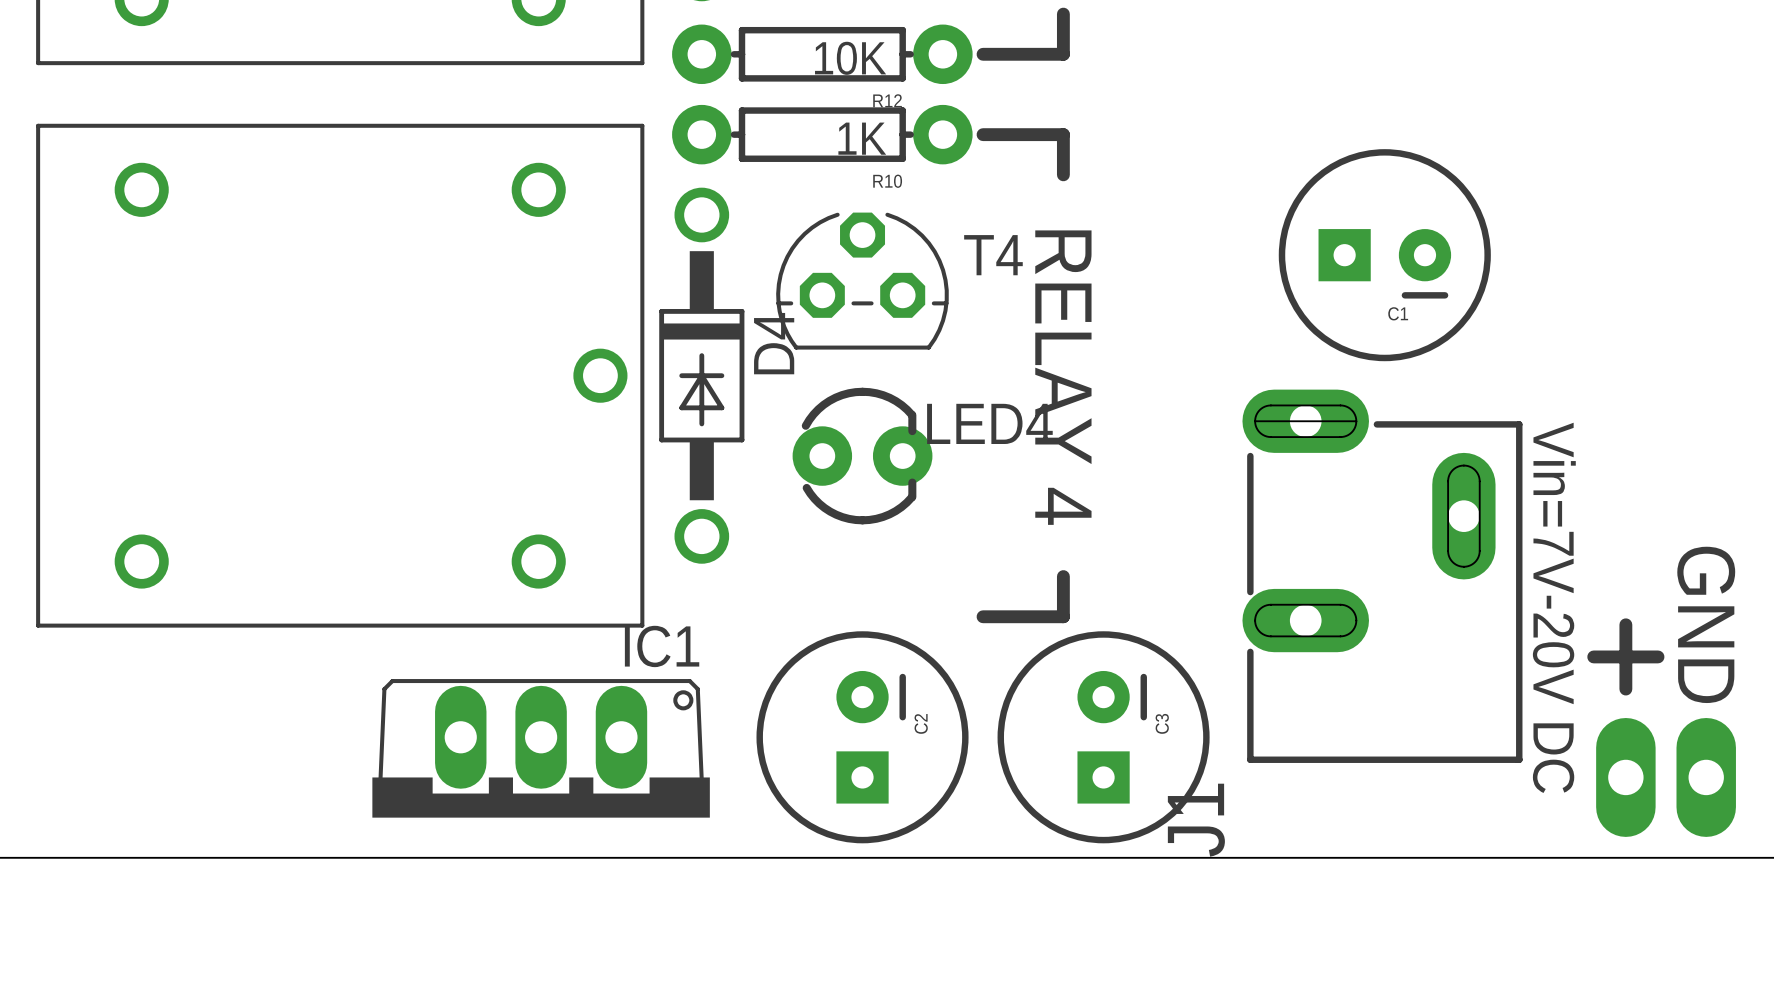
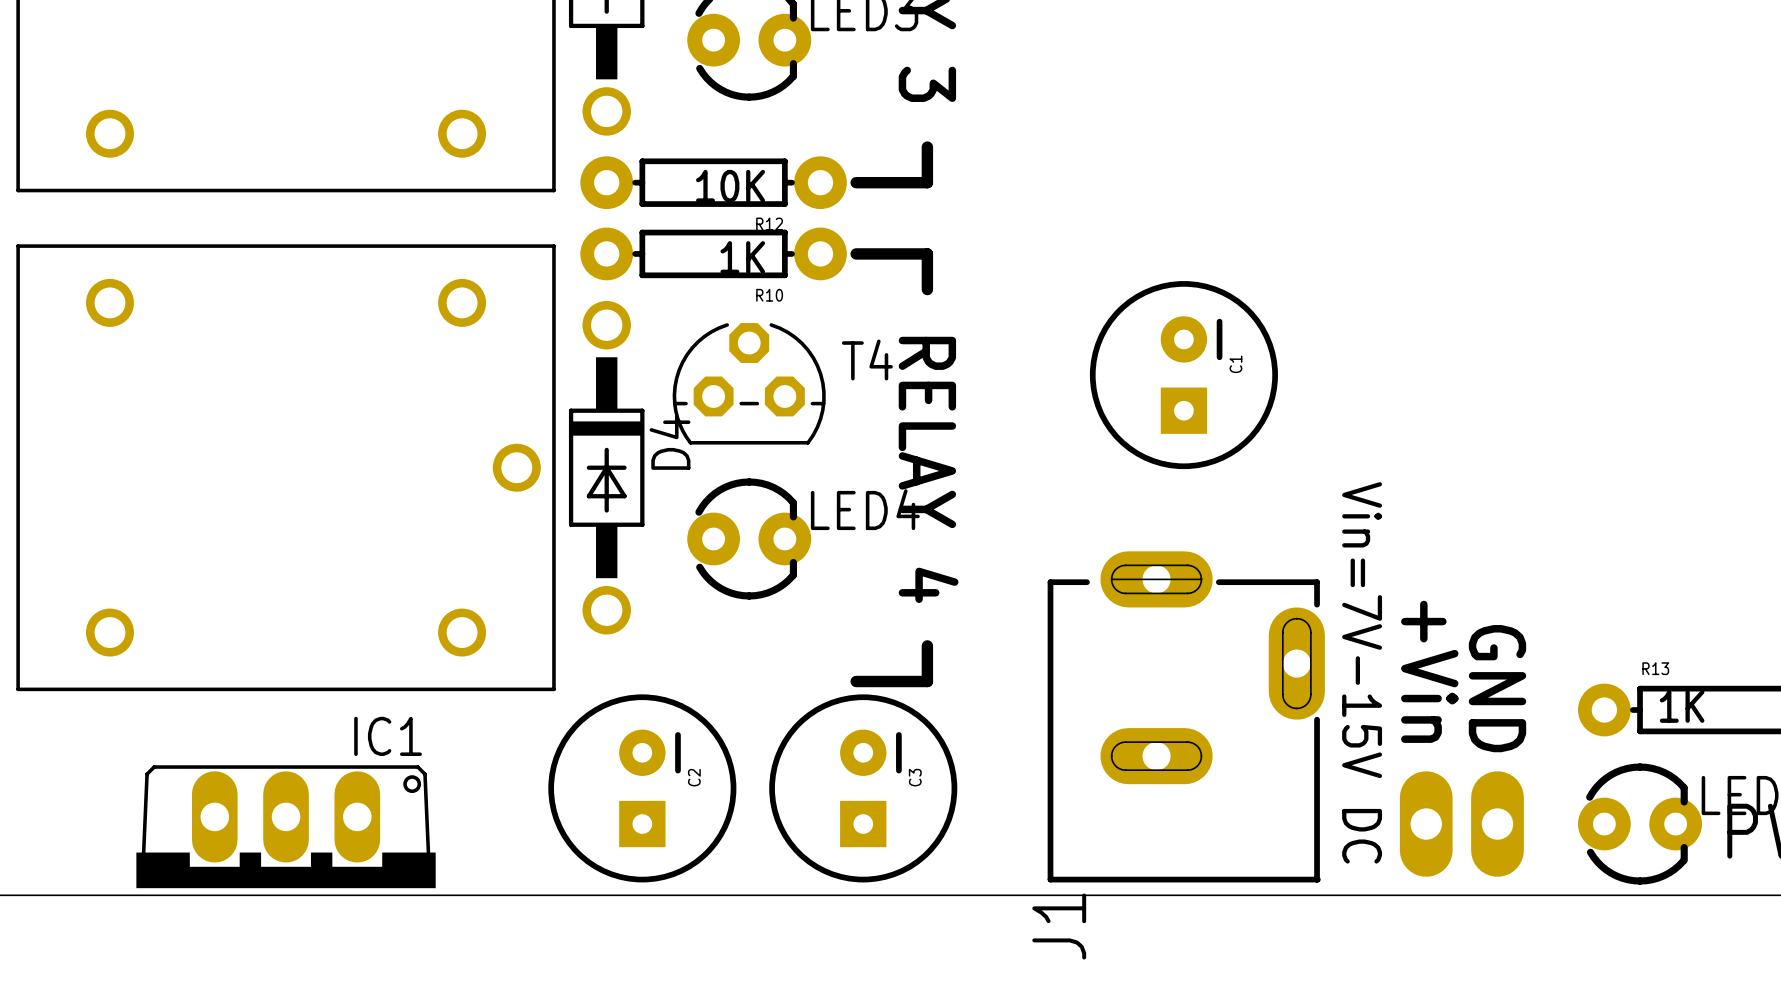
C1 rotation: 0° (1384, 255) -> 90° counterclockwise (1183, 375)
J1 footprint: [1242, 389, 1523, 763] -> [1047, 551, 1325, 883]
text: none -> +Vin (1429, 671)
text: Vin=7V-20V DC (1554, 607) -> Vin=7V-15V DC (1362, 672)
line: (1625, 624) (1625, 689) -> none
line: (1593, 656) (1658, 656) -> none
C2 position: (862, 737) -> (642, 788)
C3 position: (1103, 737) -> (863, 788)
IC1 position: (541, 748) -> (286, 826)

